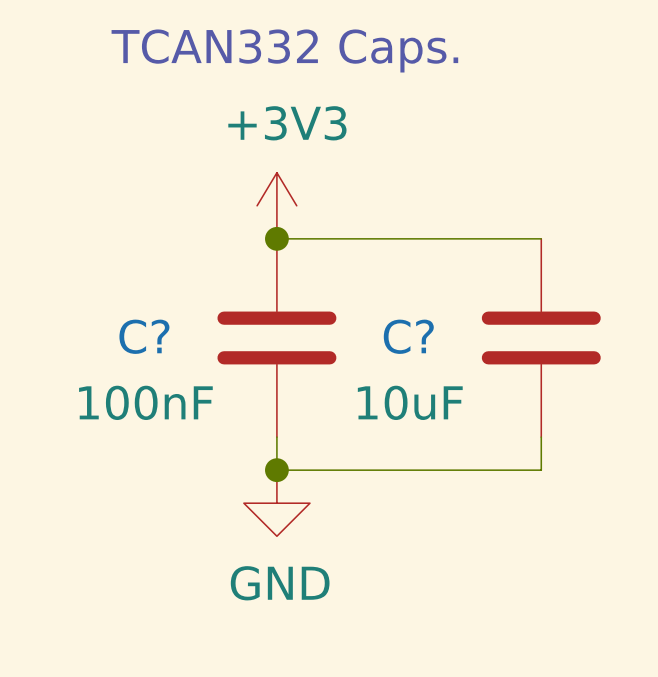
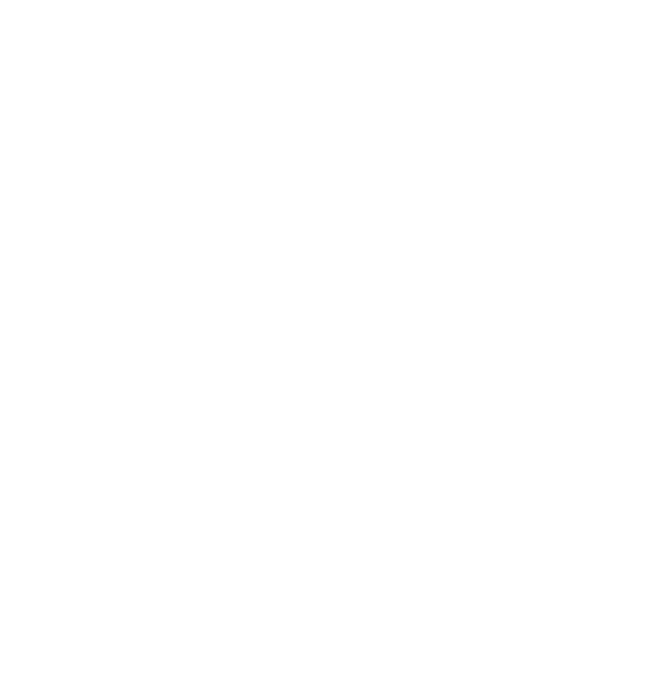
text: TCAN332 Caps. (284, 50) -> none
power symbol: +3V3 (276, 205) -> none
wire: (276, 238) (541, 238) -> none
junction: (276, 238) -> none
C?: 100nF (276, 337) -> none
C?: 10uF (541, 337) -> none
wire: (276, 437) (276, 470) (541, 470) (541, 437) -> none
junction: (276, 470) -> none
power symbol: GND (276, 503) -> none

